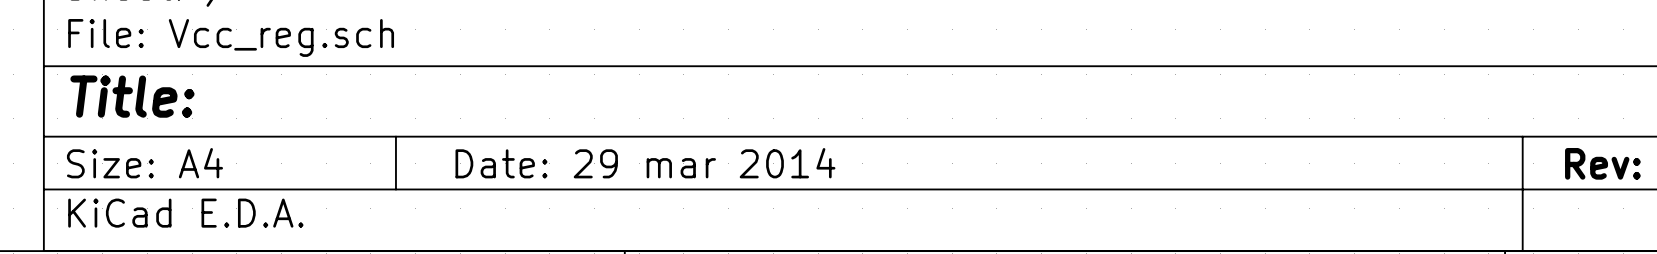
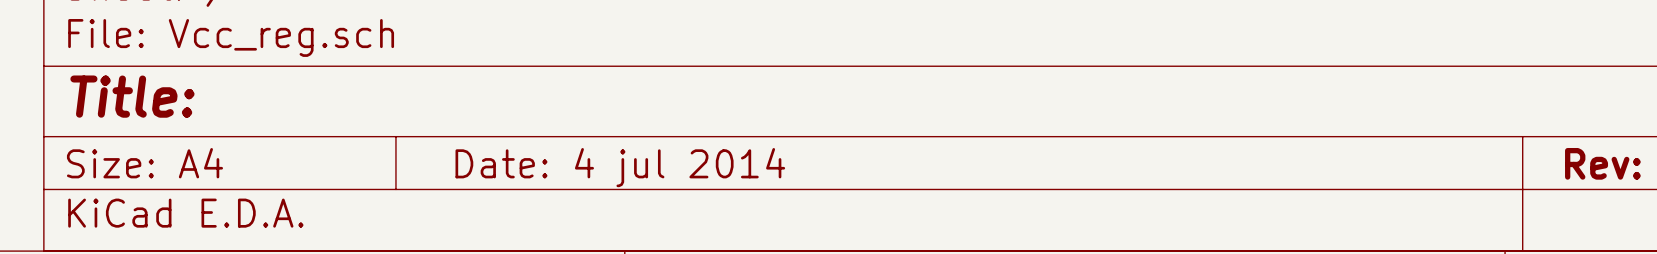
title block: Date: 29 mar 2014 (645, 163) -> Date: 4 jul 2014 (620, 167)

